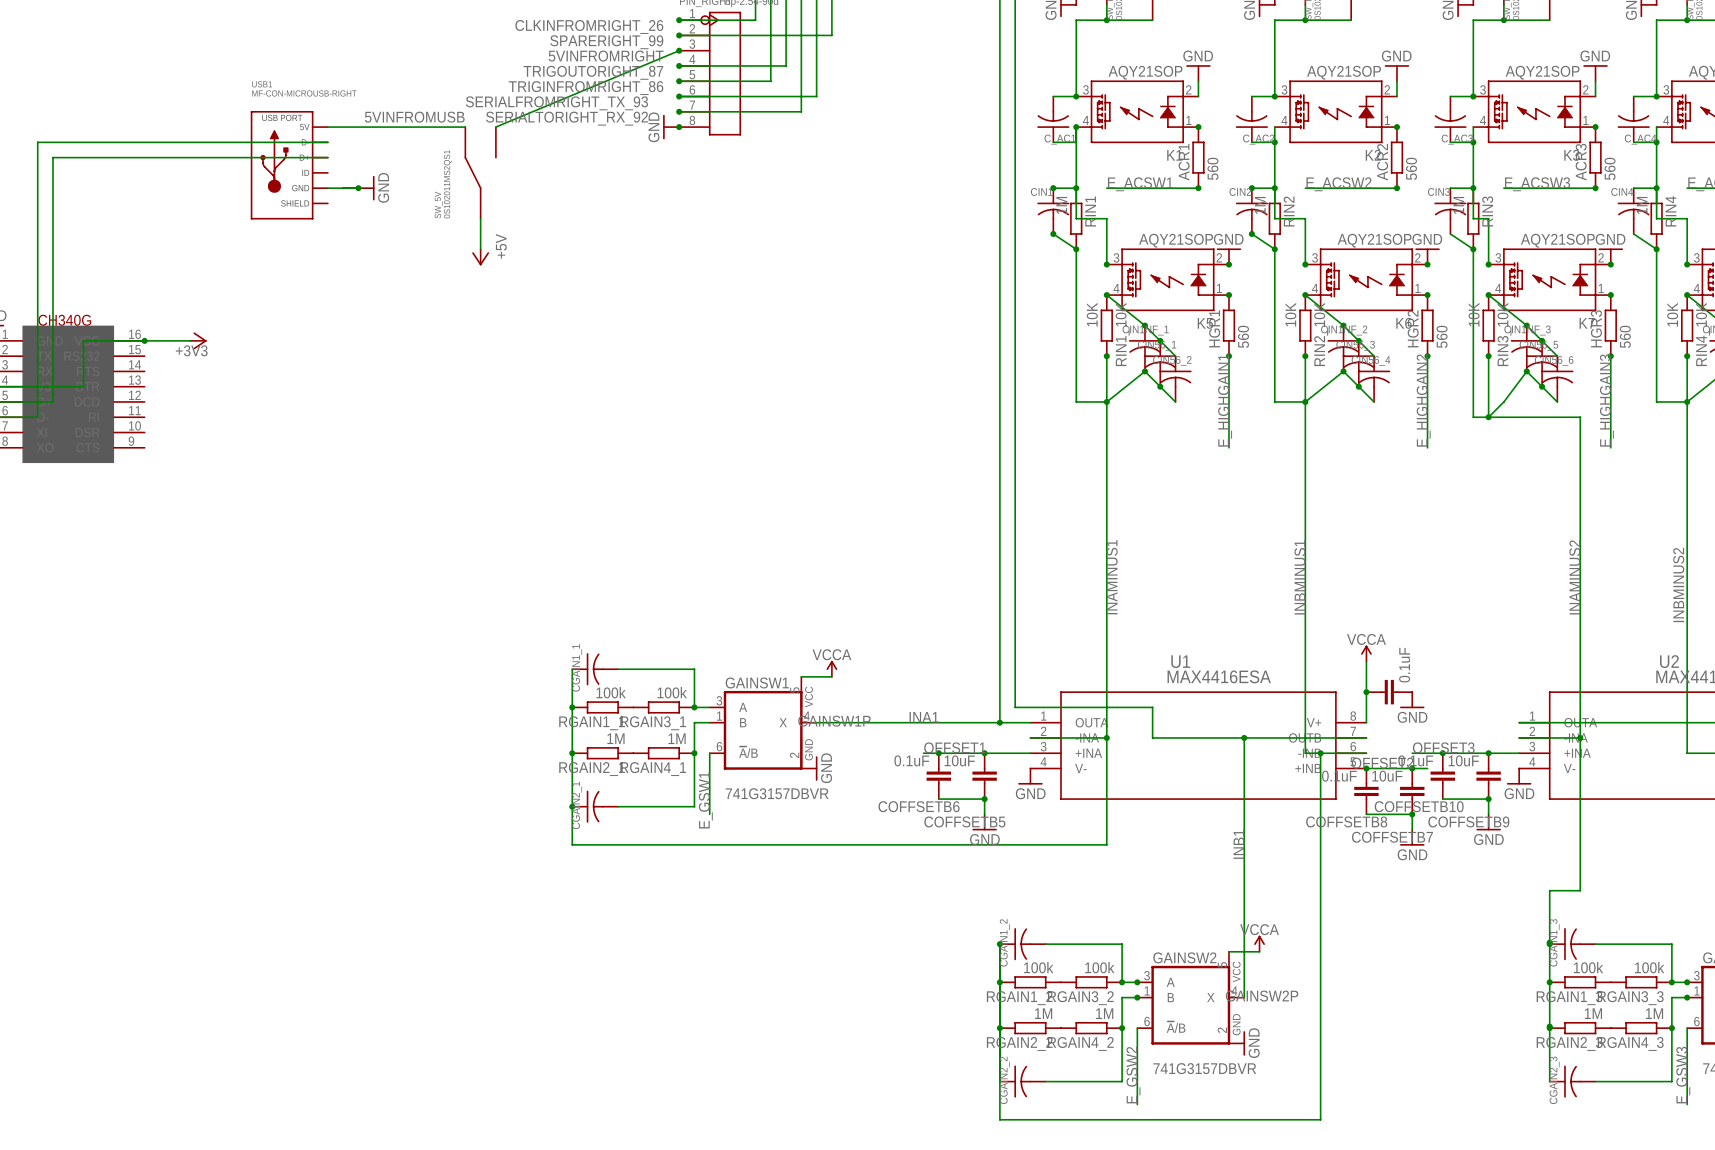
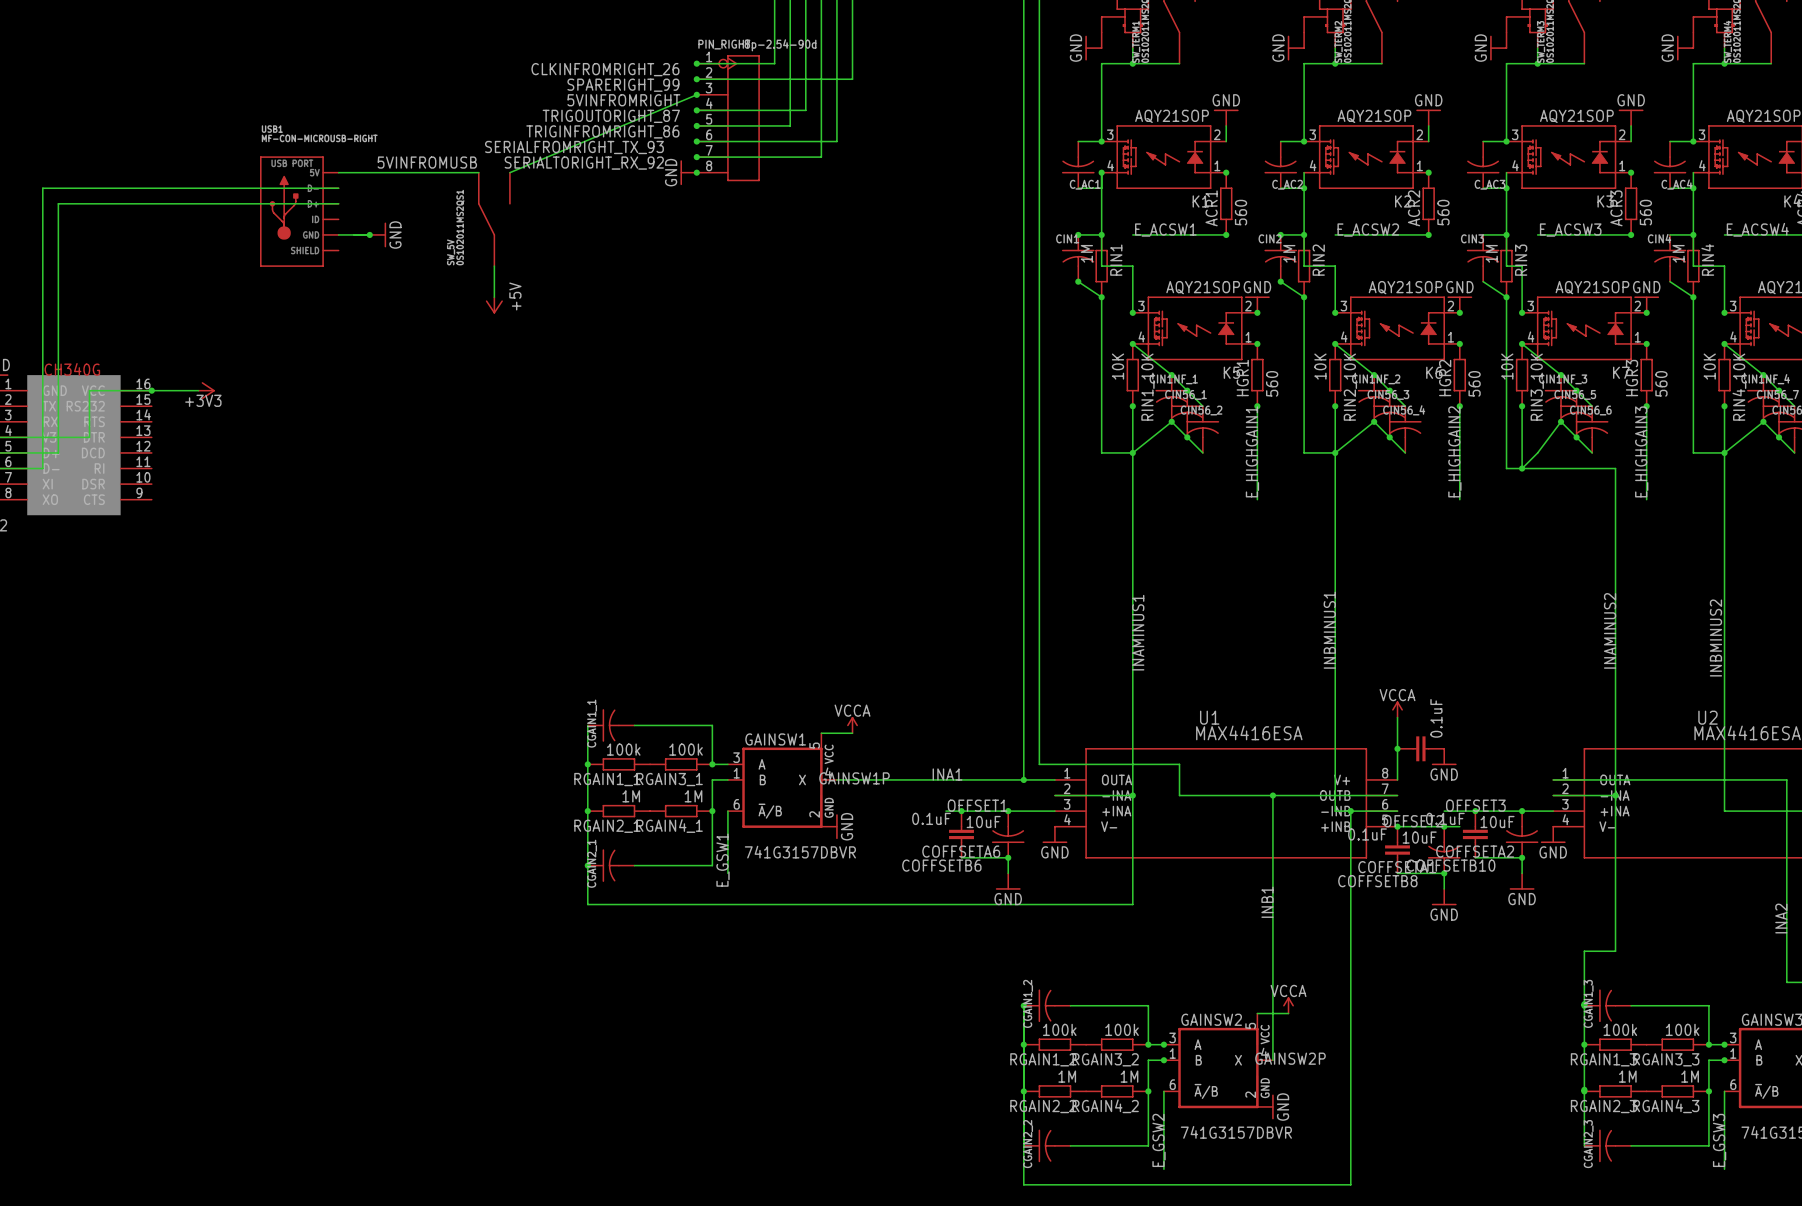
COFFSETB5: 10uF (984, 776) -> none
COFFSETA6: none -> 10uF (1008, 834)
COFFSETB9: 10uF (1488, 776) -> none
COFFSETA2: none -> 10uF (1522, 834)
COFFSETB7: 10uF (1412, 791) -> none
COFFSETA1: none -> 10uF (1444, 850)

